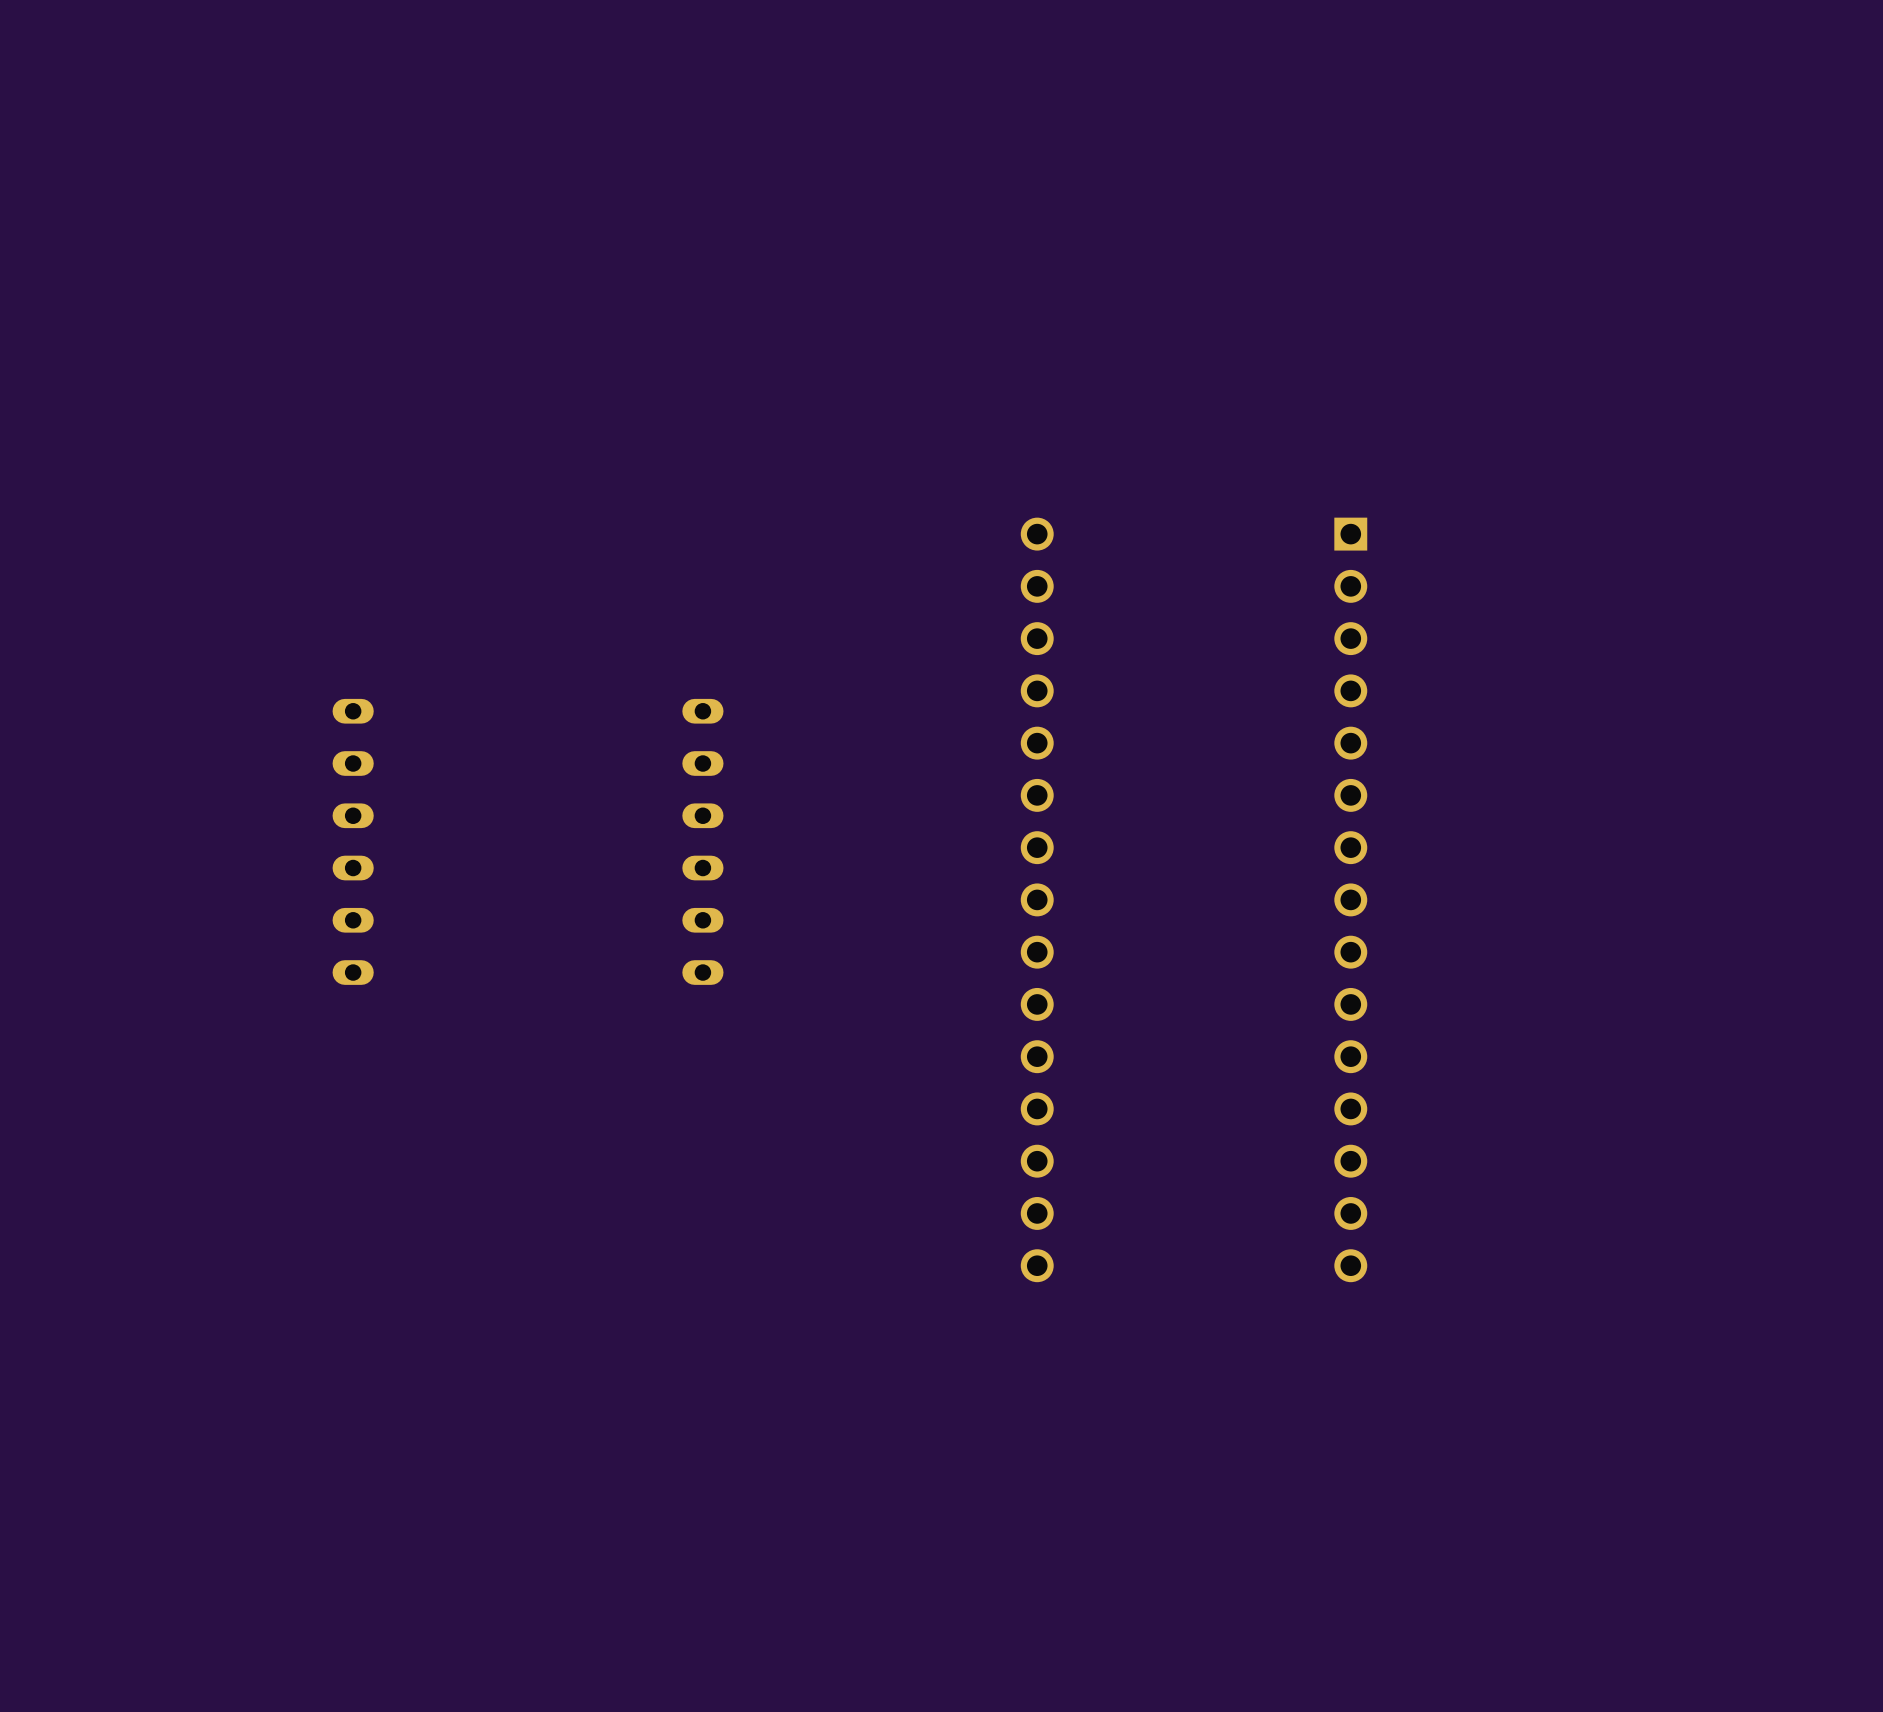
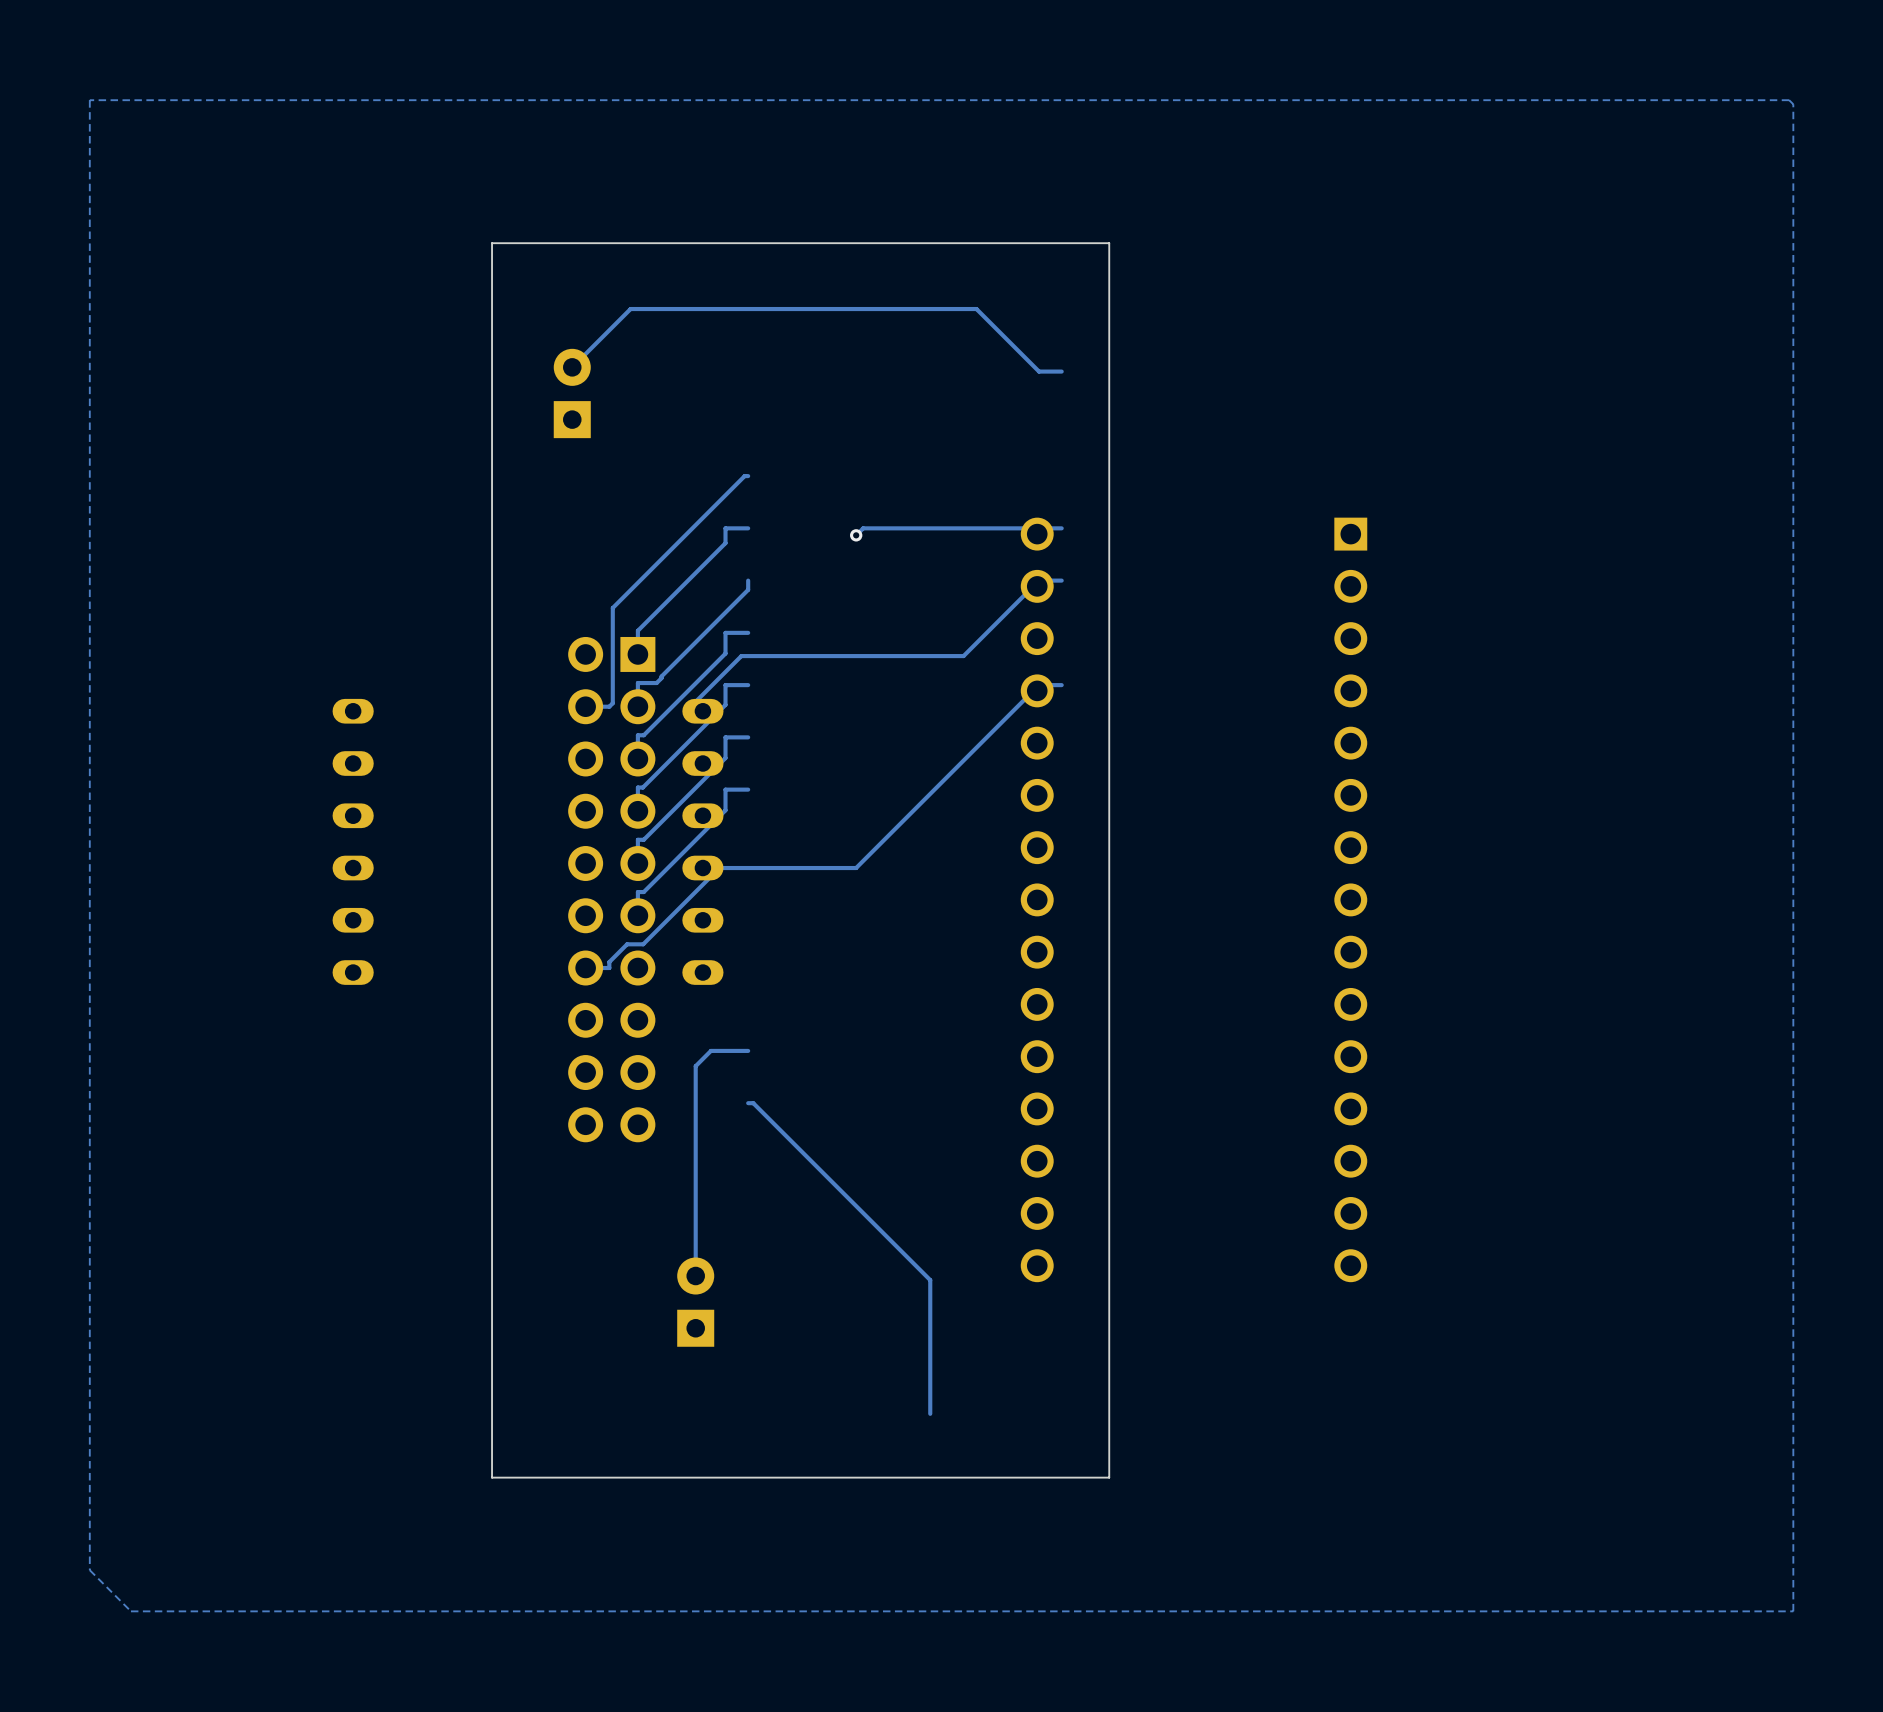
zone outline: none -> (1789, 100) (89, 100) (89, 1570) (130, 1611) (1793, 1611) (1793, 104) (1789, 100)
board edge: none -> (1109, 243) (492, 243) (492, 1477) (1109, 1477) (1109, 243)
track: none -> (572, 367) (630, 309) (976, 309) (1039, 371) (1061, 371)
part: none -> (572, 393)
track: none -> (748, 476) (744, 476) (612, 607) (612, 703) (609, 706) (585, 706)
track: none -> (748, 528) (725, 528) (725, 543) (637, 630) (637, 654)
track: none -> (1061, 528) (863, 528) (856, 535)
via: none -> (856, 535)
track: none -> (748, 580) (748, 589) (656, 683) (637, 683) (637, 706)
track: none -> (1061, 580) (1039, 580) (963, 656) (741, 656) (695, 701) (695, 704)
track: none -> (748, 632) (725, 632) (725, 653) (643, 735) (637, 735) (637, 758)
track: none -> (748, 685) (725, 685) (725, 704) (642, 787) (637, 787) (637, 811)
track: none -> (1061, 685) (1039, 685) (856, 868) (719, 868) (643, 944) (627, 944) (609, 962) (609, 968) (585, 968)
track: none -> (748, 737) (725, 737) (725, 758) (643, 839) (637, 839) (637, 863)
track: none -> (748, 789) (725, 789) (725, 810) (643, 892) (637, 892) (637, 915)
part: none -> (611, 889)
track: none -> (748, 1050) (710, 1050) (695, 1066) (695, 1276)
track: none -> (748, 1103) (753, 1103) (930, 1280) (930, 1413)
part: none -> (695, 1302)

